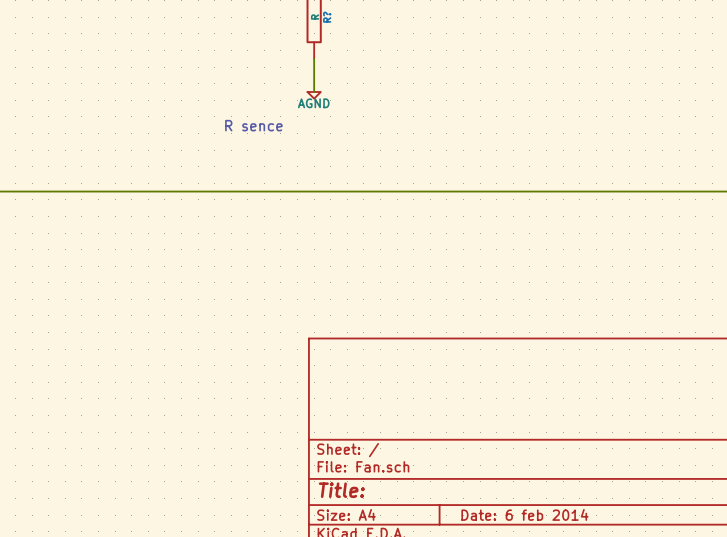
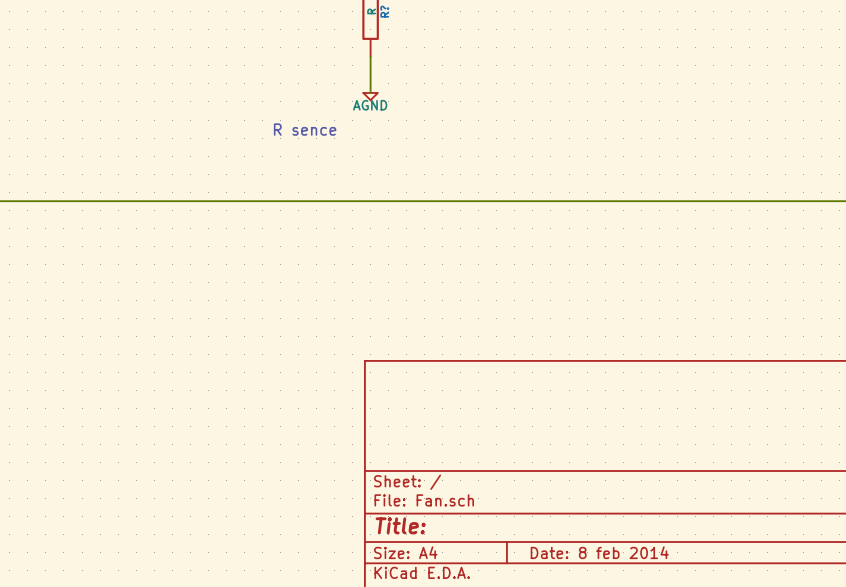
title block: Date: 6 feb 2014 (524, 514) -> Date: 8 feb 2014 (599, 552)

